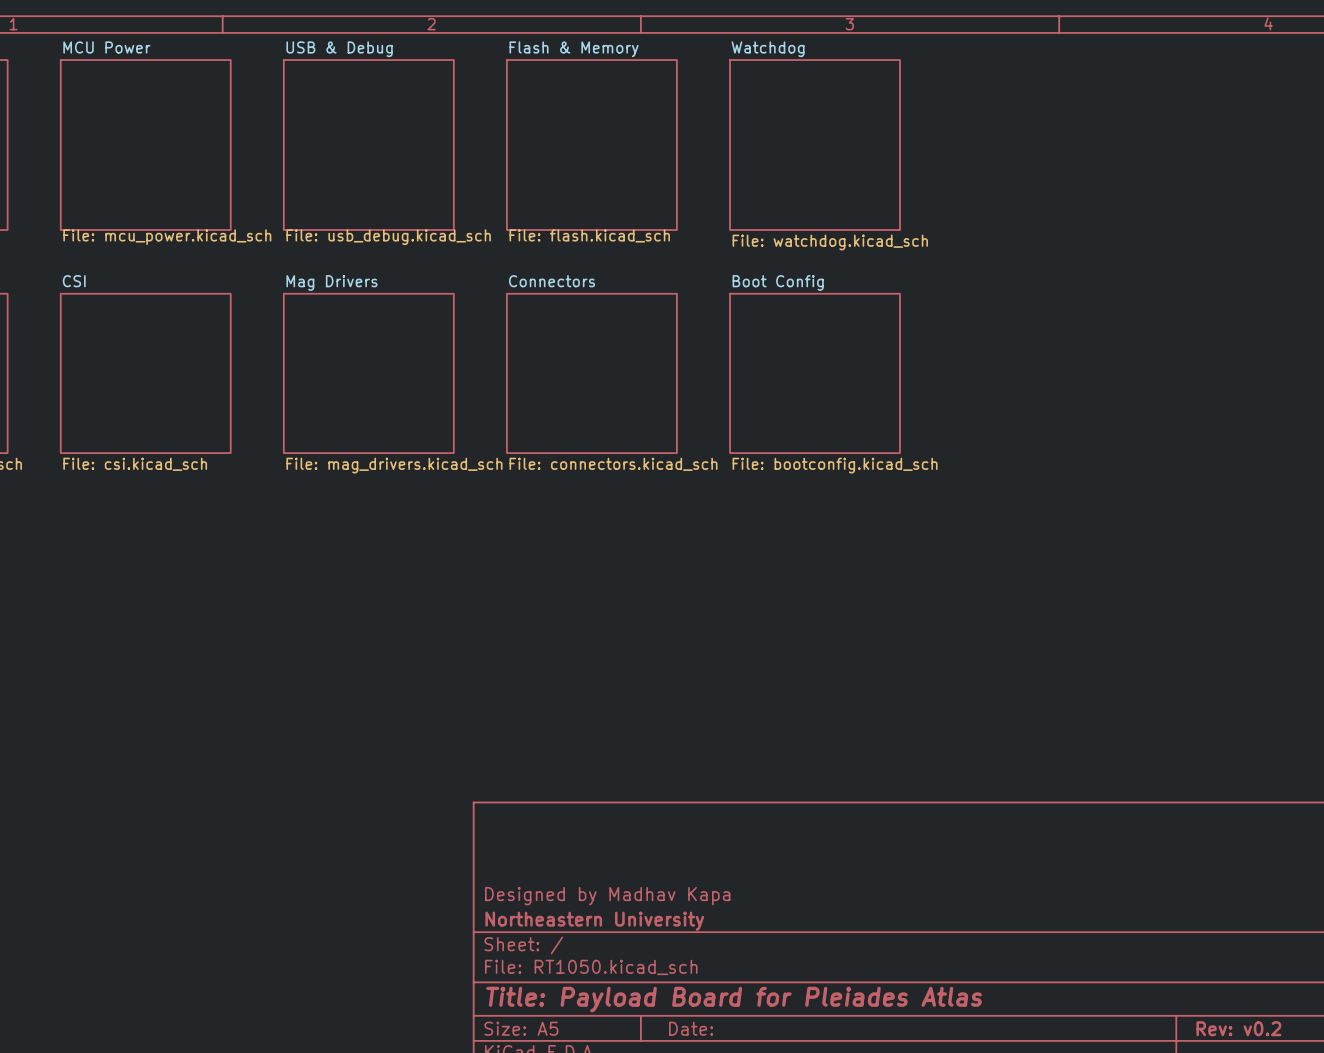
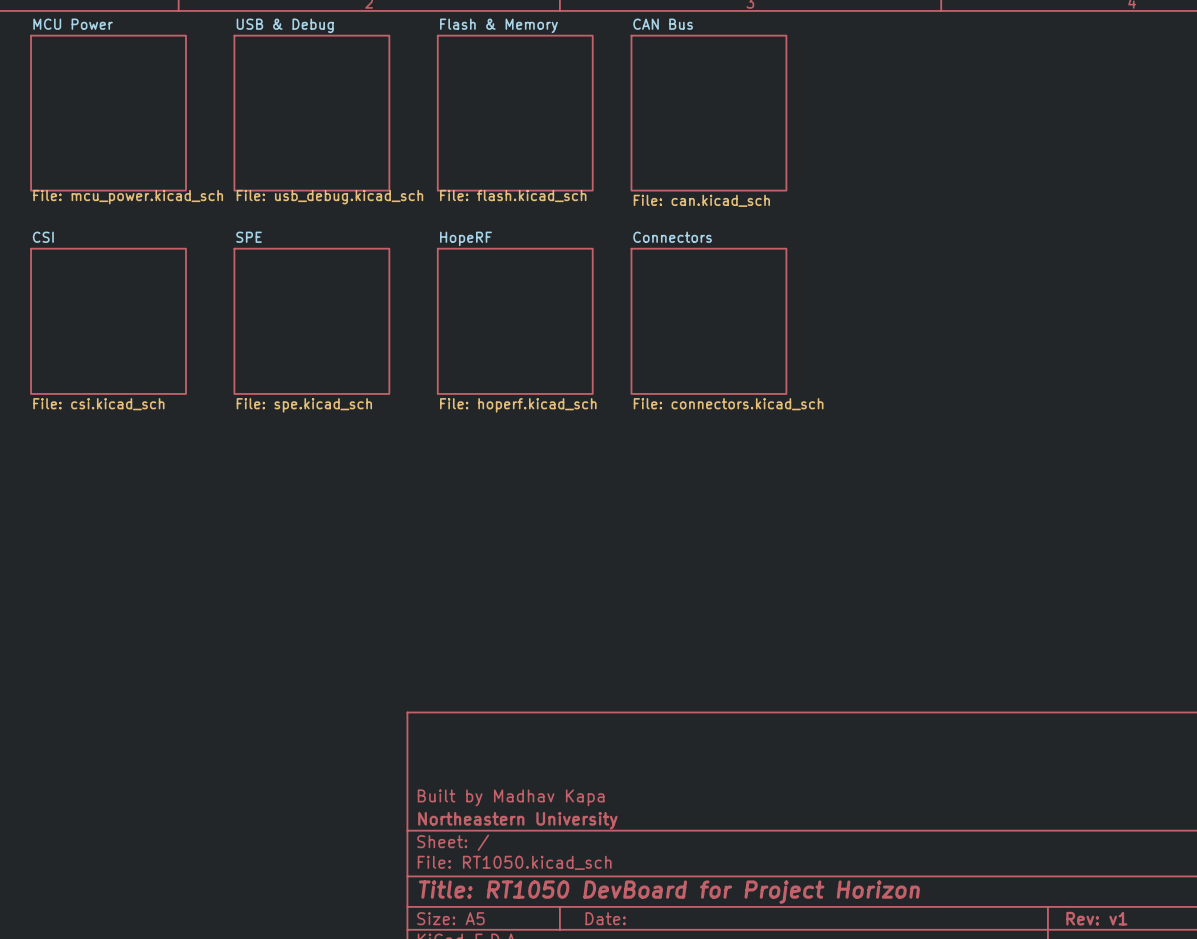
sheet CAN Bus: none -> File: can.kicad_sch (708, 113)
sheet Watchdog: File: watchdog.kicad_sch (815, 145) -> none
sheet Connectors name: Connectors (552, 281) -> HopeRF (465, 238)
sheet Mag Drivers name: Mag Drivers (331, 282) -> SPE (249, 237)
sheet Connectors: none -> File: connectors.kicad_sch (708, 321)
sheet Boot Config: File: bootconfig.kicad_sch (815, 373) -> none
sheet Connectors value: File: connectors.kicad_sch (613, 464) -> File: hoperf.kicad_sch (518, 405)
sheet Mag Drivers value: File: mag_drivers.kicad_sch (394, 465) -> File: spe.kicad_sch (304, 405)
title block: Designed by Madhav Kapa (607, 896) -> Built by Madhav Kapa (511, 797)
title block: Title: Payload Board for Pleiades Atlas (734, 999) -> Title: RT1050 DevBoard for Project Horizon (669, 892)
title block: Rev: v0.2 (1238, 1028) -> Rev: v1 (1096, 918)

